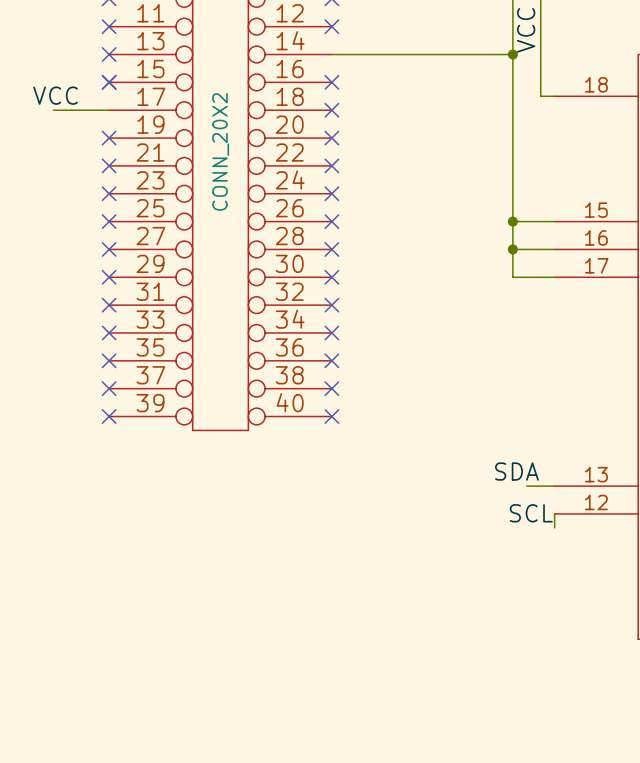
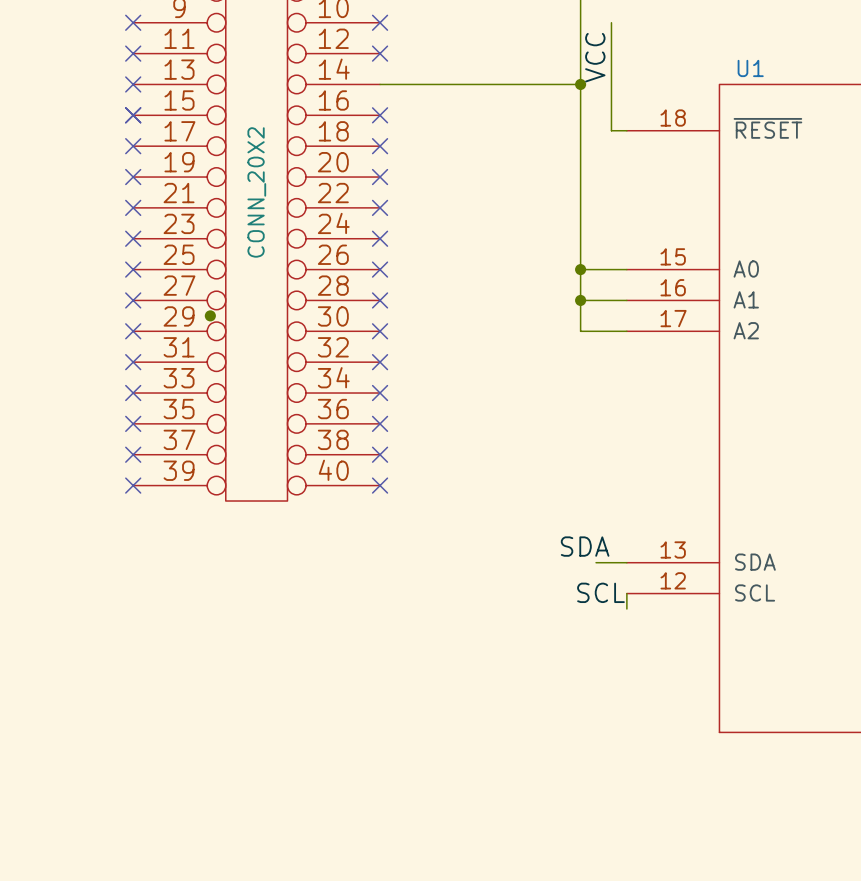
label: VCC (55, 95) -> none
wire: (53, 110) (109, 110) -> none
no-connect mark: none -> (133, 146)
junction: none -> (210, 315)

